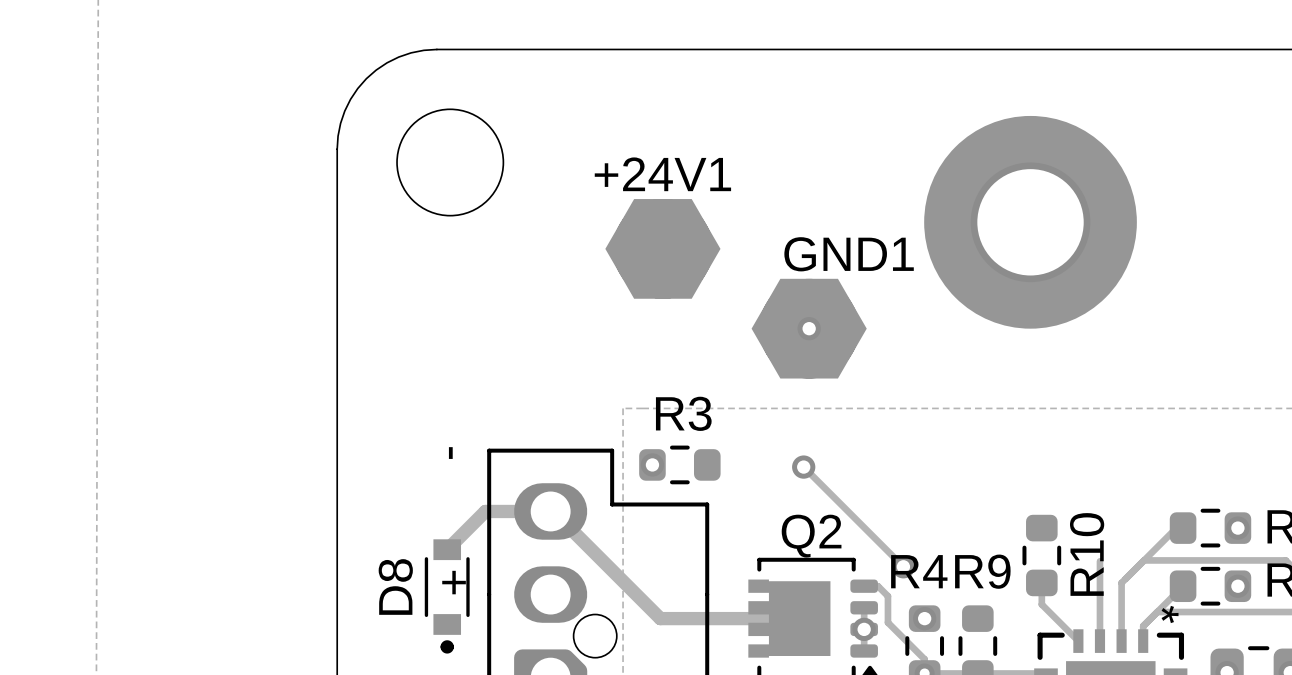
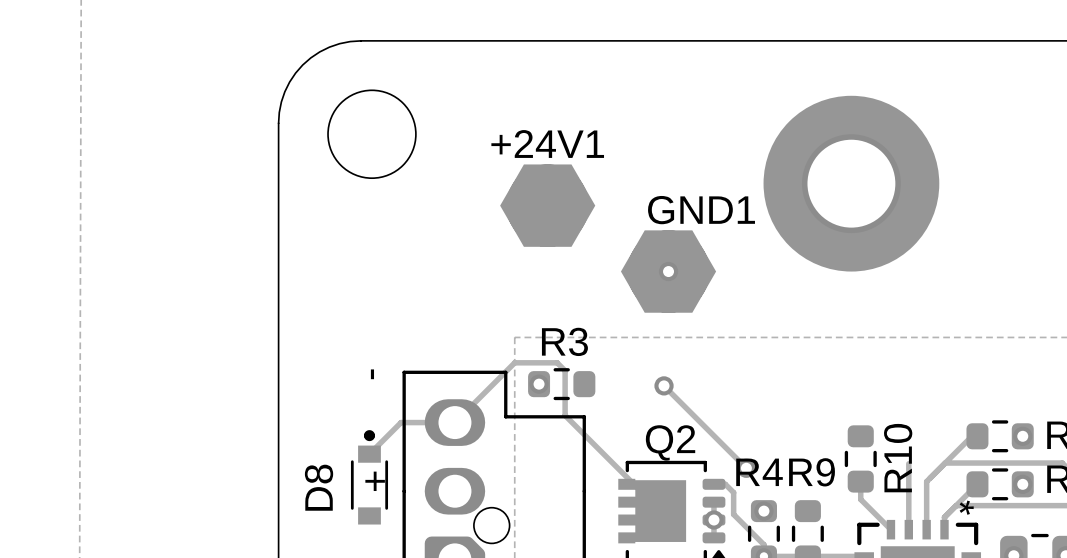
track: (550, 511) (553, 511) (660, 618) (799, 618) -> (454, 422) (514, 362) (557, 362) (565, 370) (565, 415) (660, 511)
track width: thick (550, 511) (485, 511) (447, 549) -> thin (454, 422) (401, 422) (369, 454)
D8 rotation: 0° (447, 596) -> 180° (369, 477)

